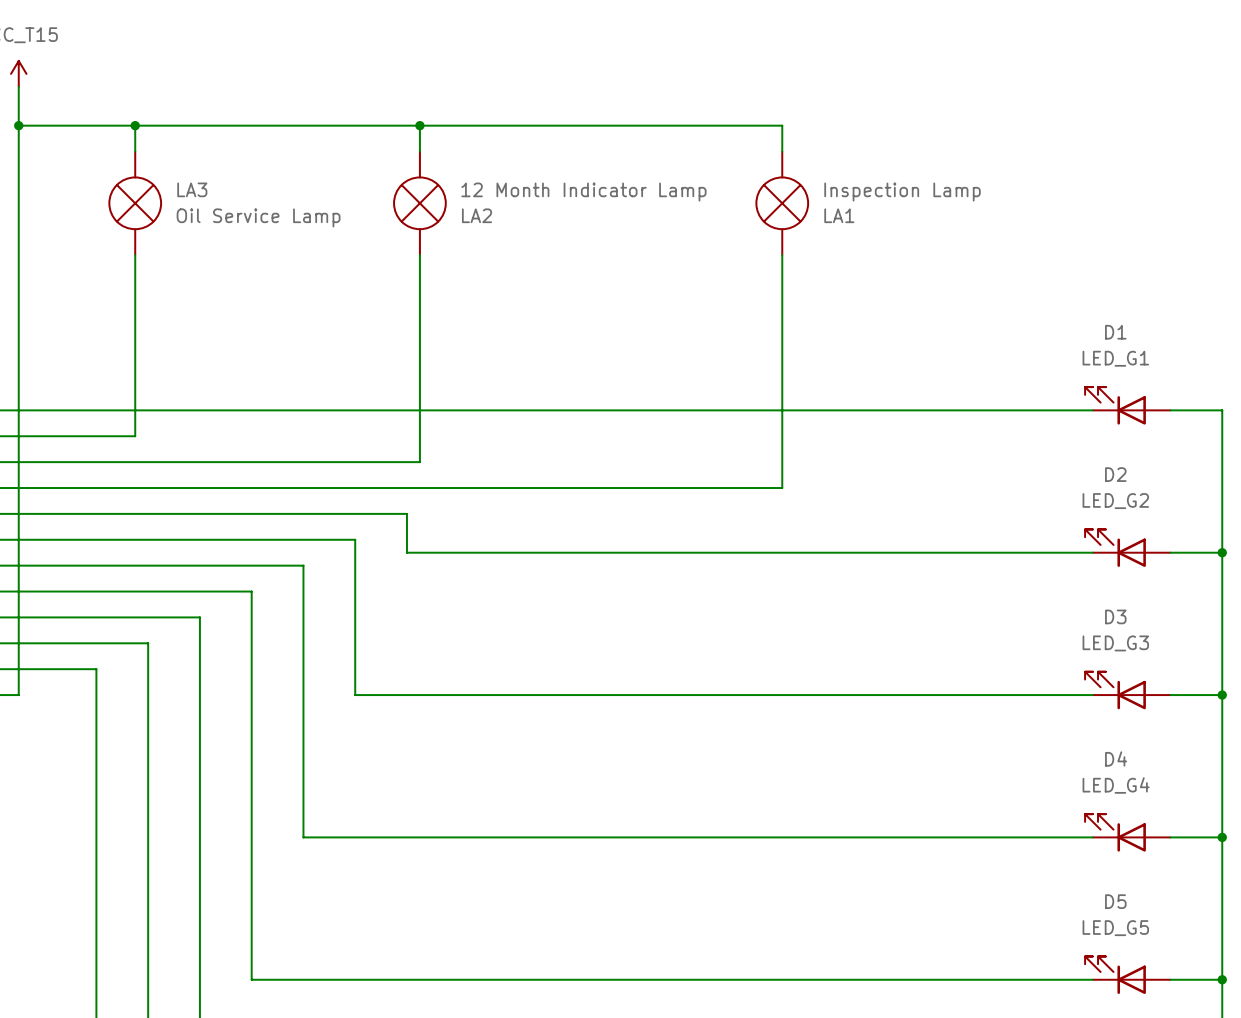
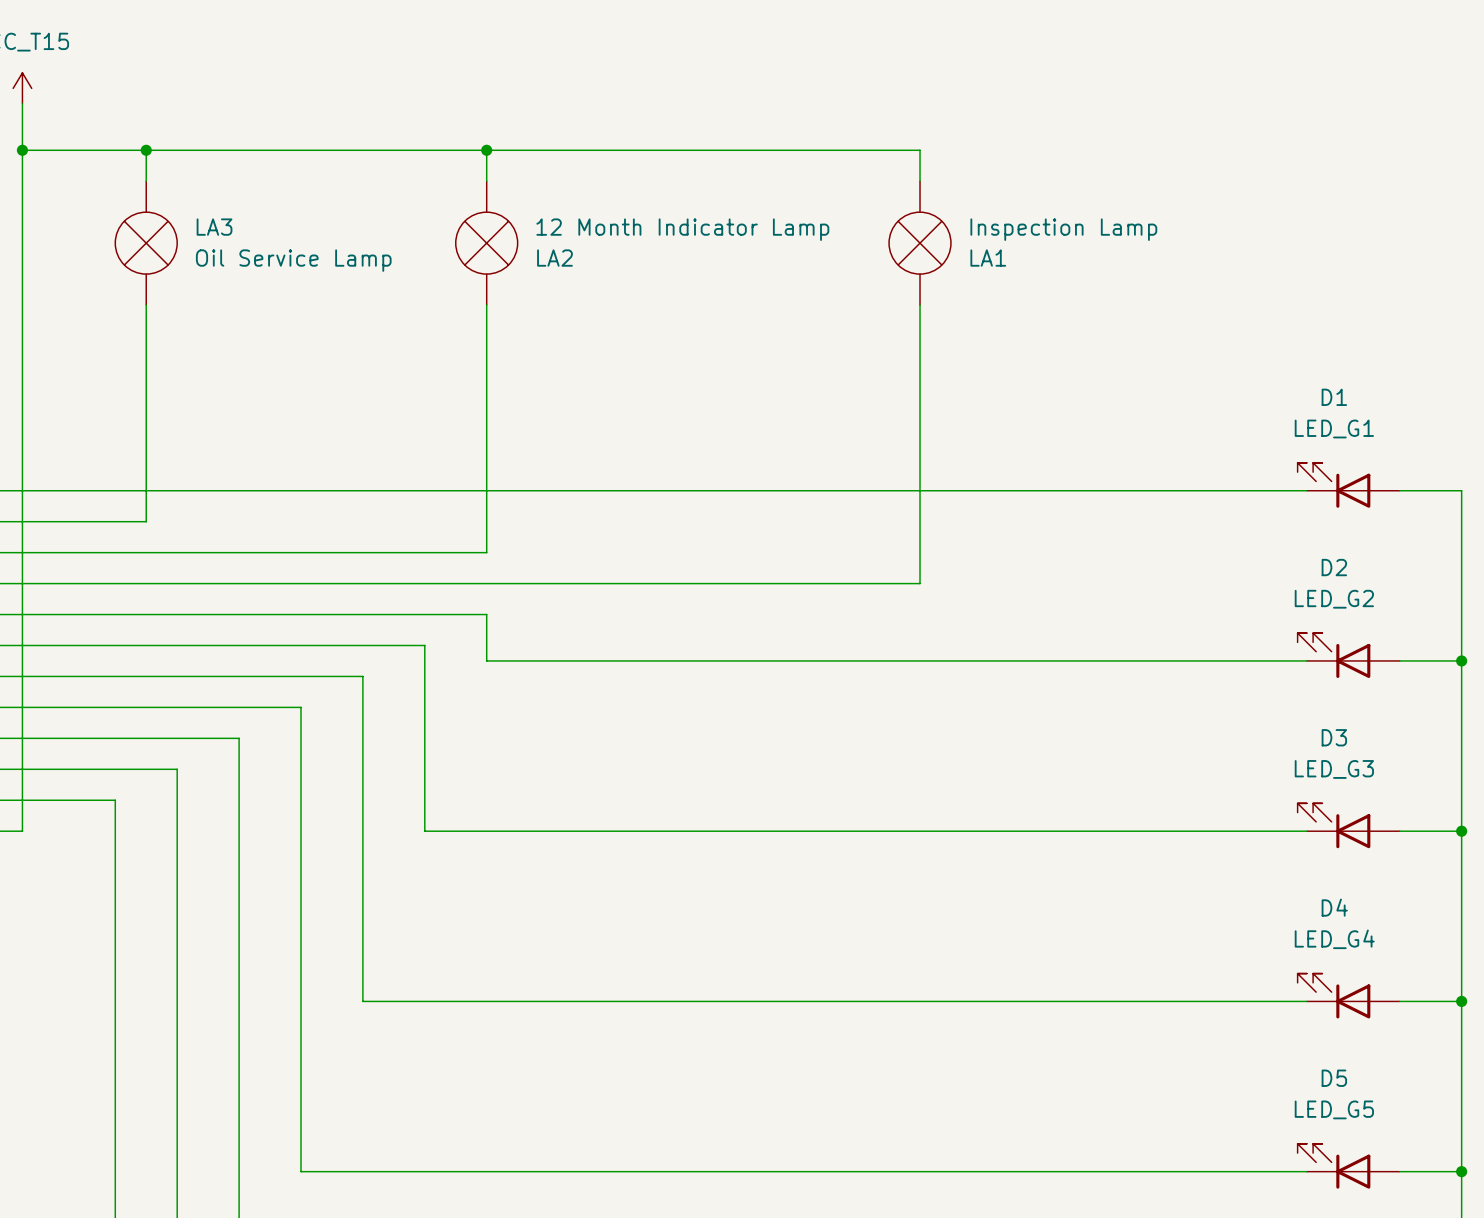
wire: (135, 125) (135, 151) -> (146, 150) (146, 181)
junction position: (135, 125) -> (146, 150)
wire: (419, 125) (419, 151) -> (486, 150) (486, 181)
junction position: (419, 125) -> (486, 150)
wire: (769, 125) (782, 125) (782, 151) -> (920, 150) (920, 181)
LA3 position: (135, 203) -> (146, 243)
LA2 position: (419, 203) -> (486, 243)
LA1 position: (782, 203) -> (920, 243)
wire: (135, 255) (135, 436) (122, 436) -> (146, 305) (146, 521)
wire: (419, 255) (419, 462) (406, 462) -> (486, 305) (486, 552)
wire: (782, 255) (782, 488) (769, 488) -> (920, 305) (920, 583)

